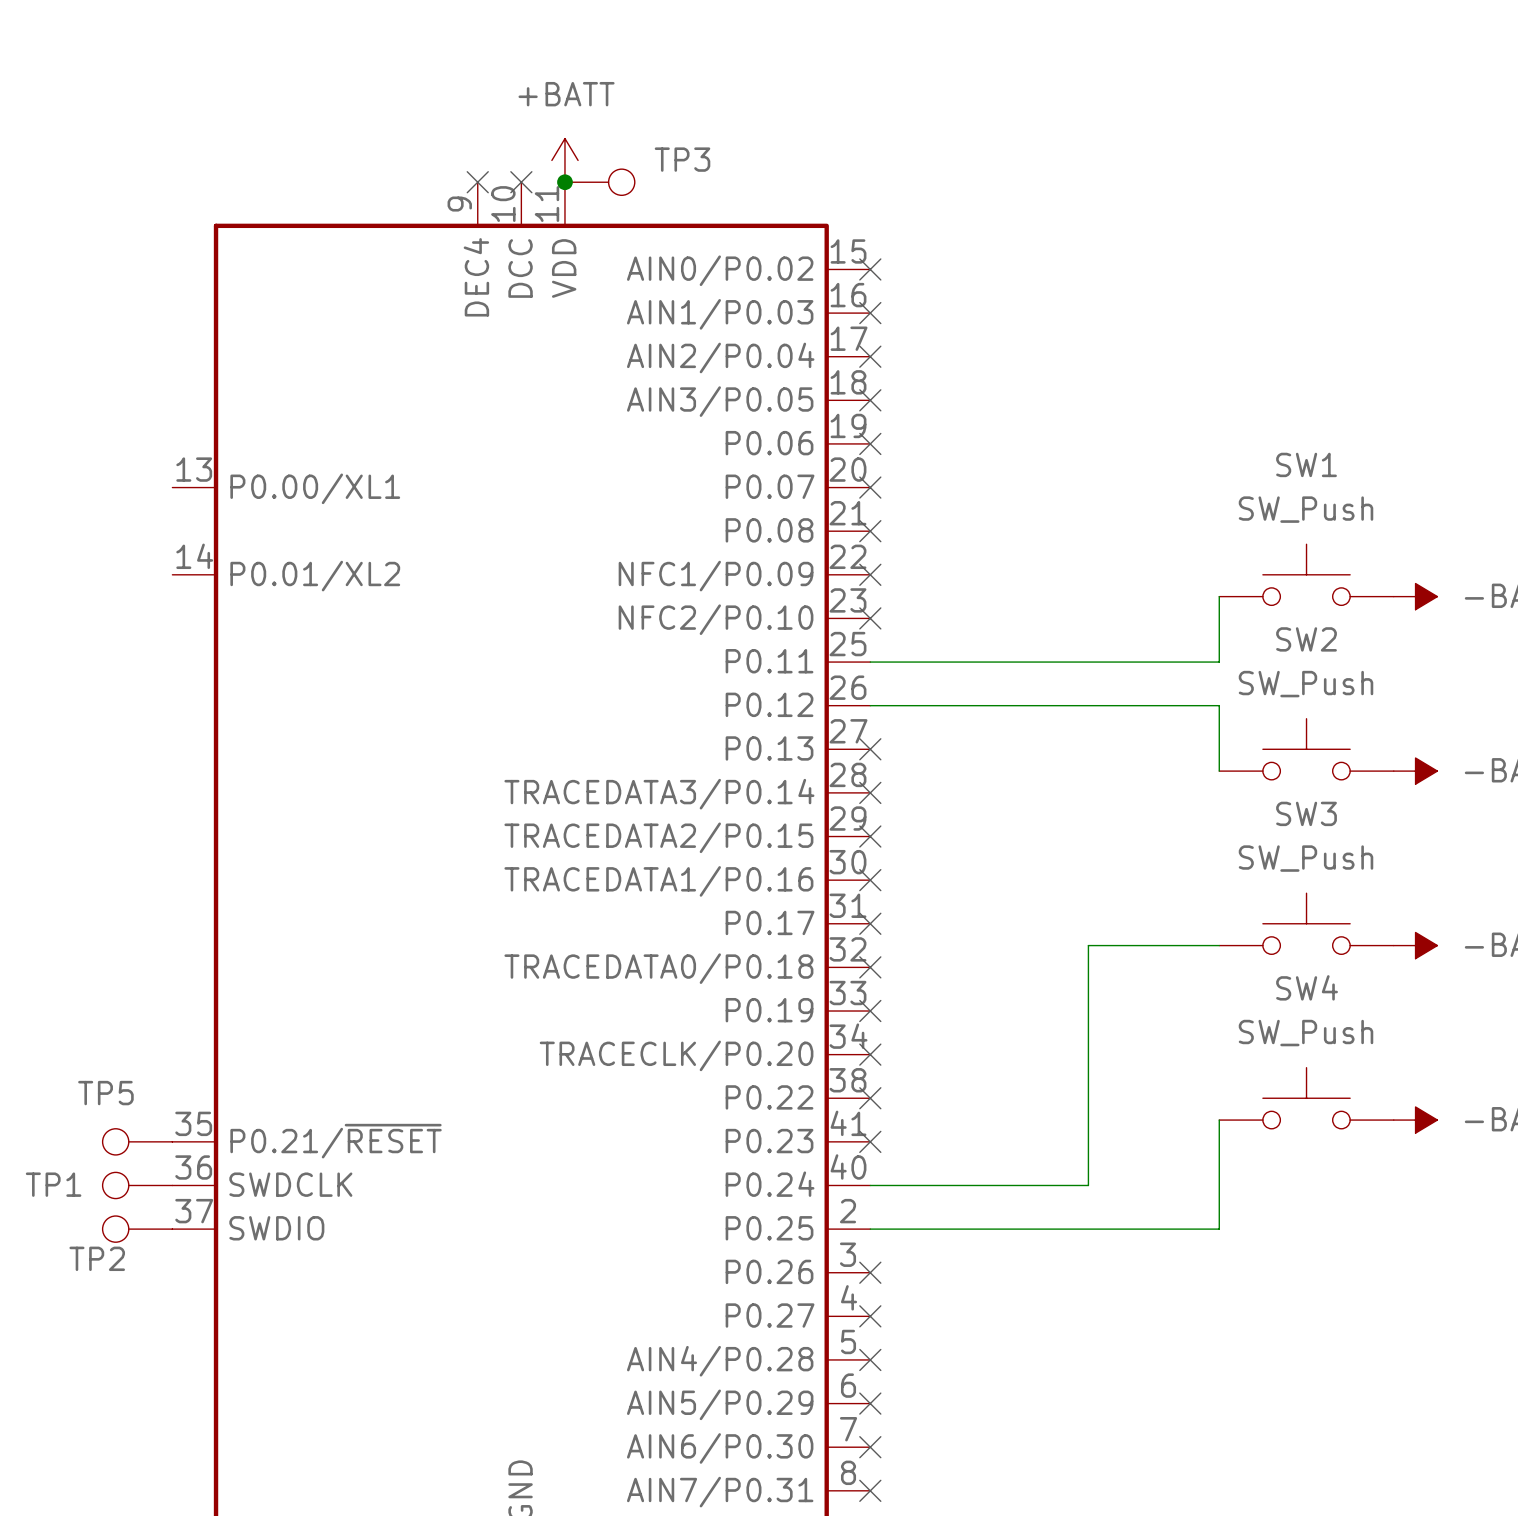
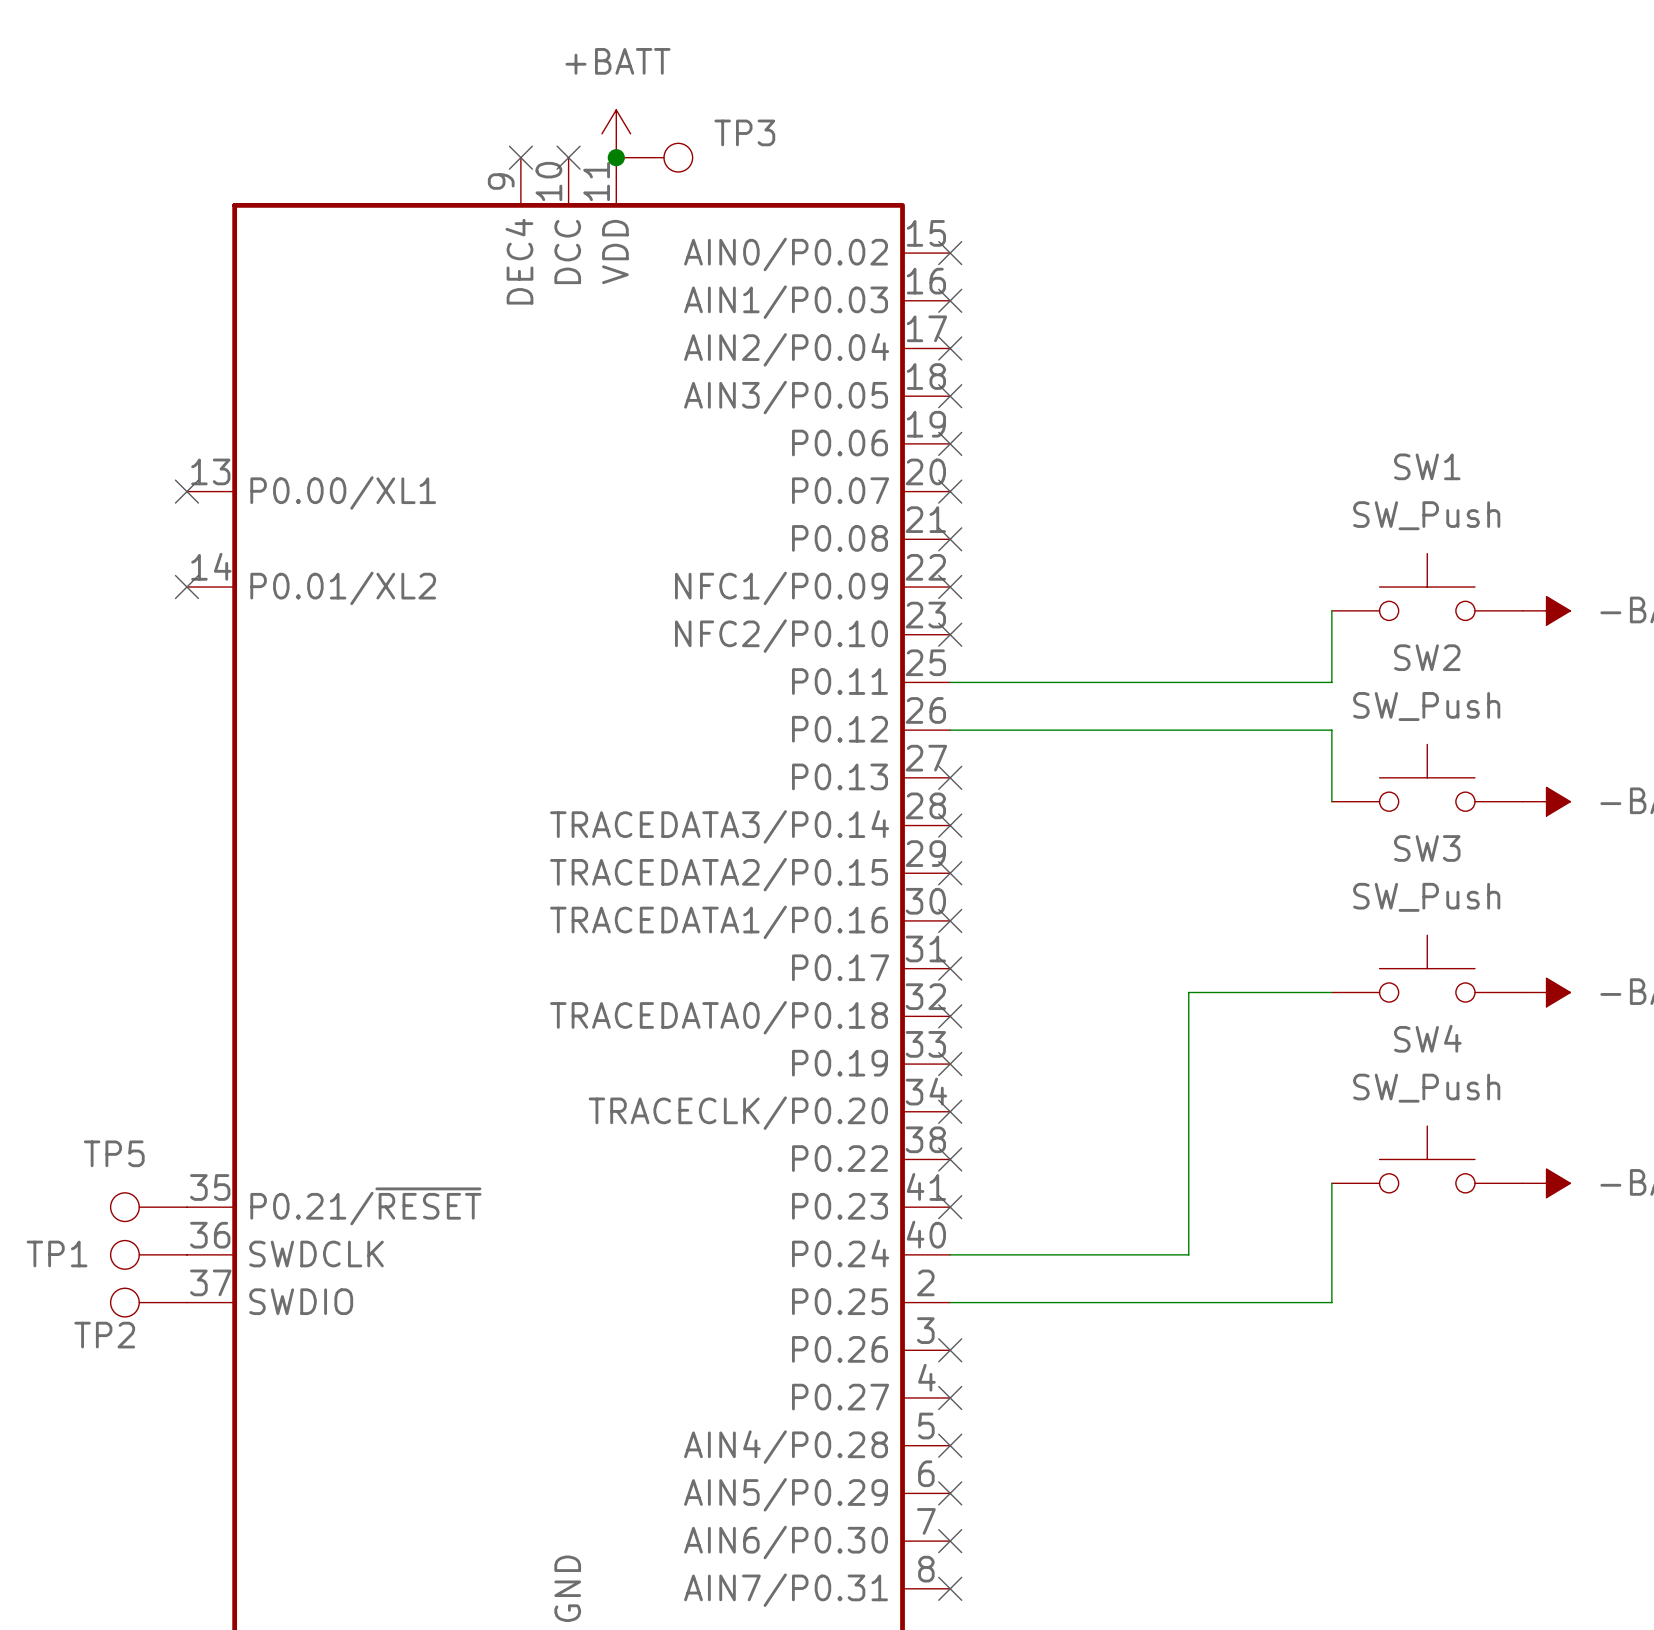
no-connect mark: none -> (186, 491)
no-connect mark: none -> (186, 587)

